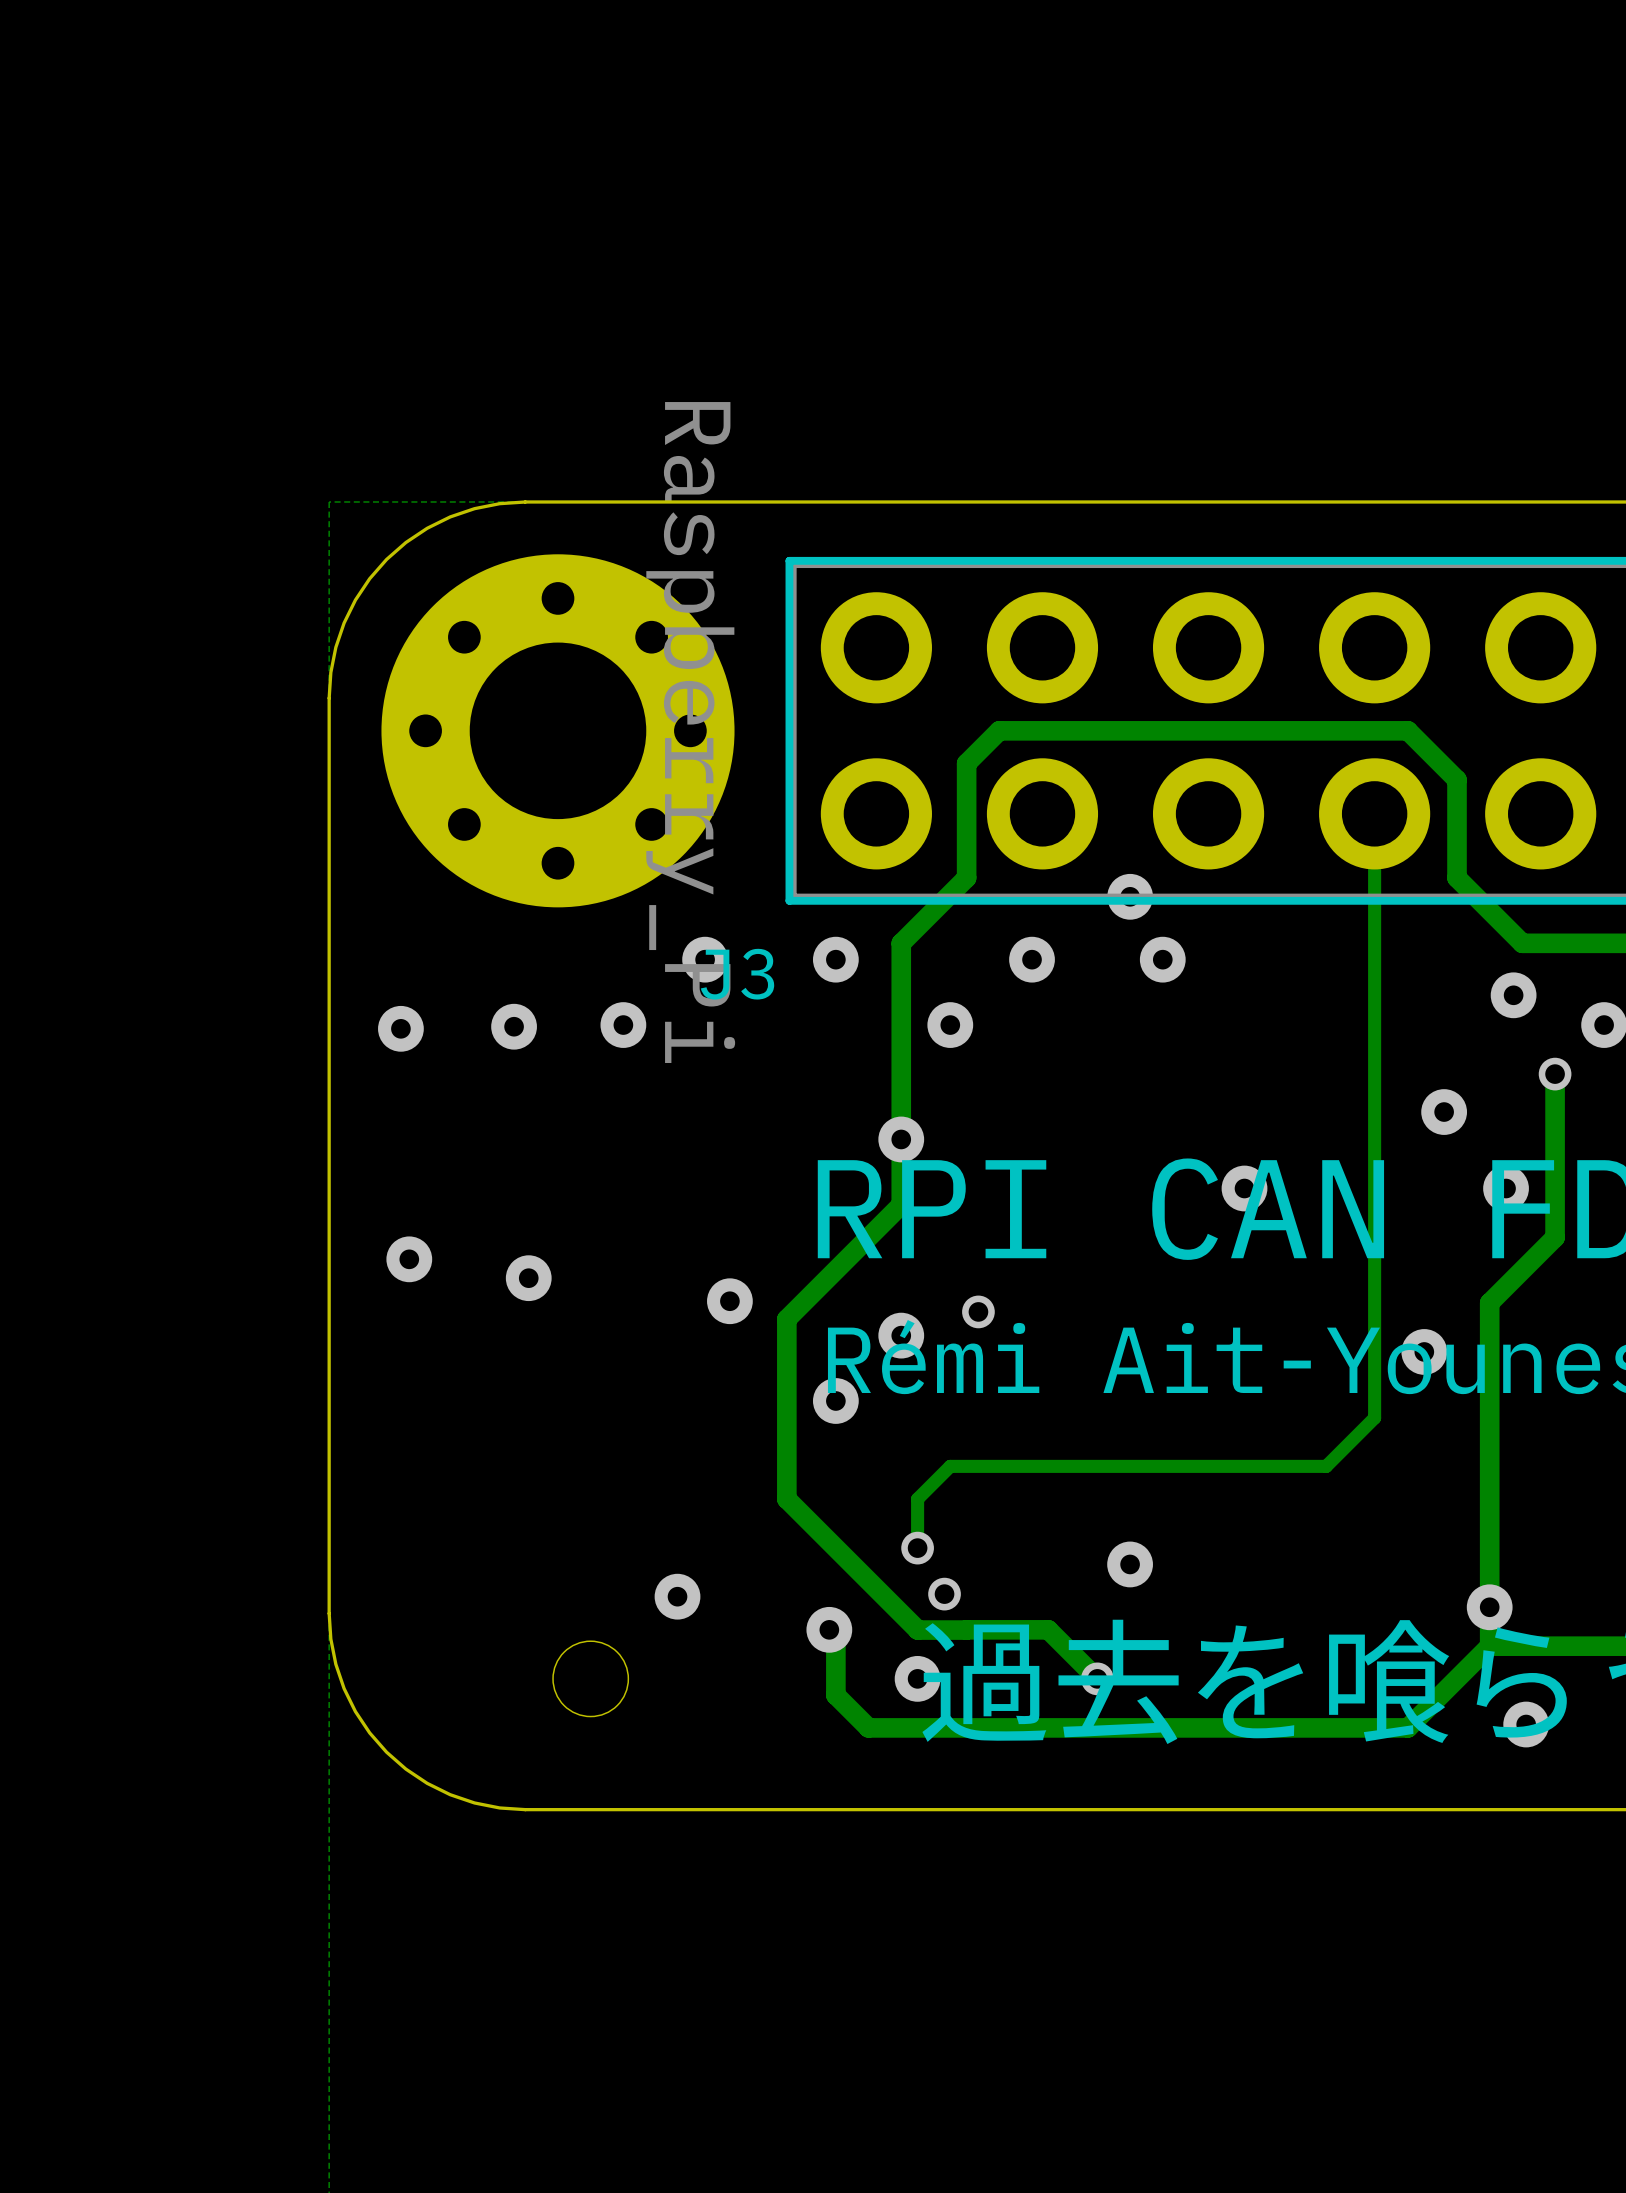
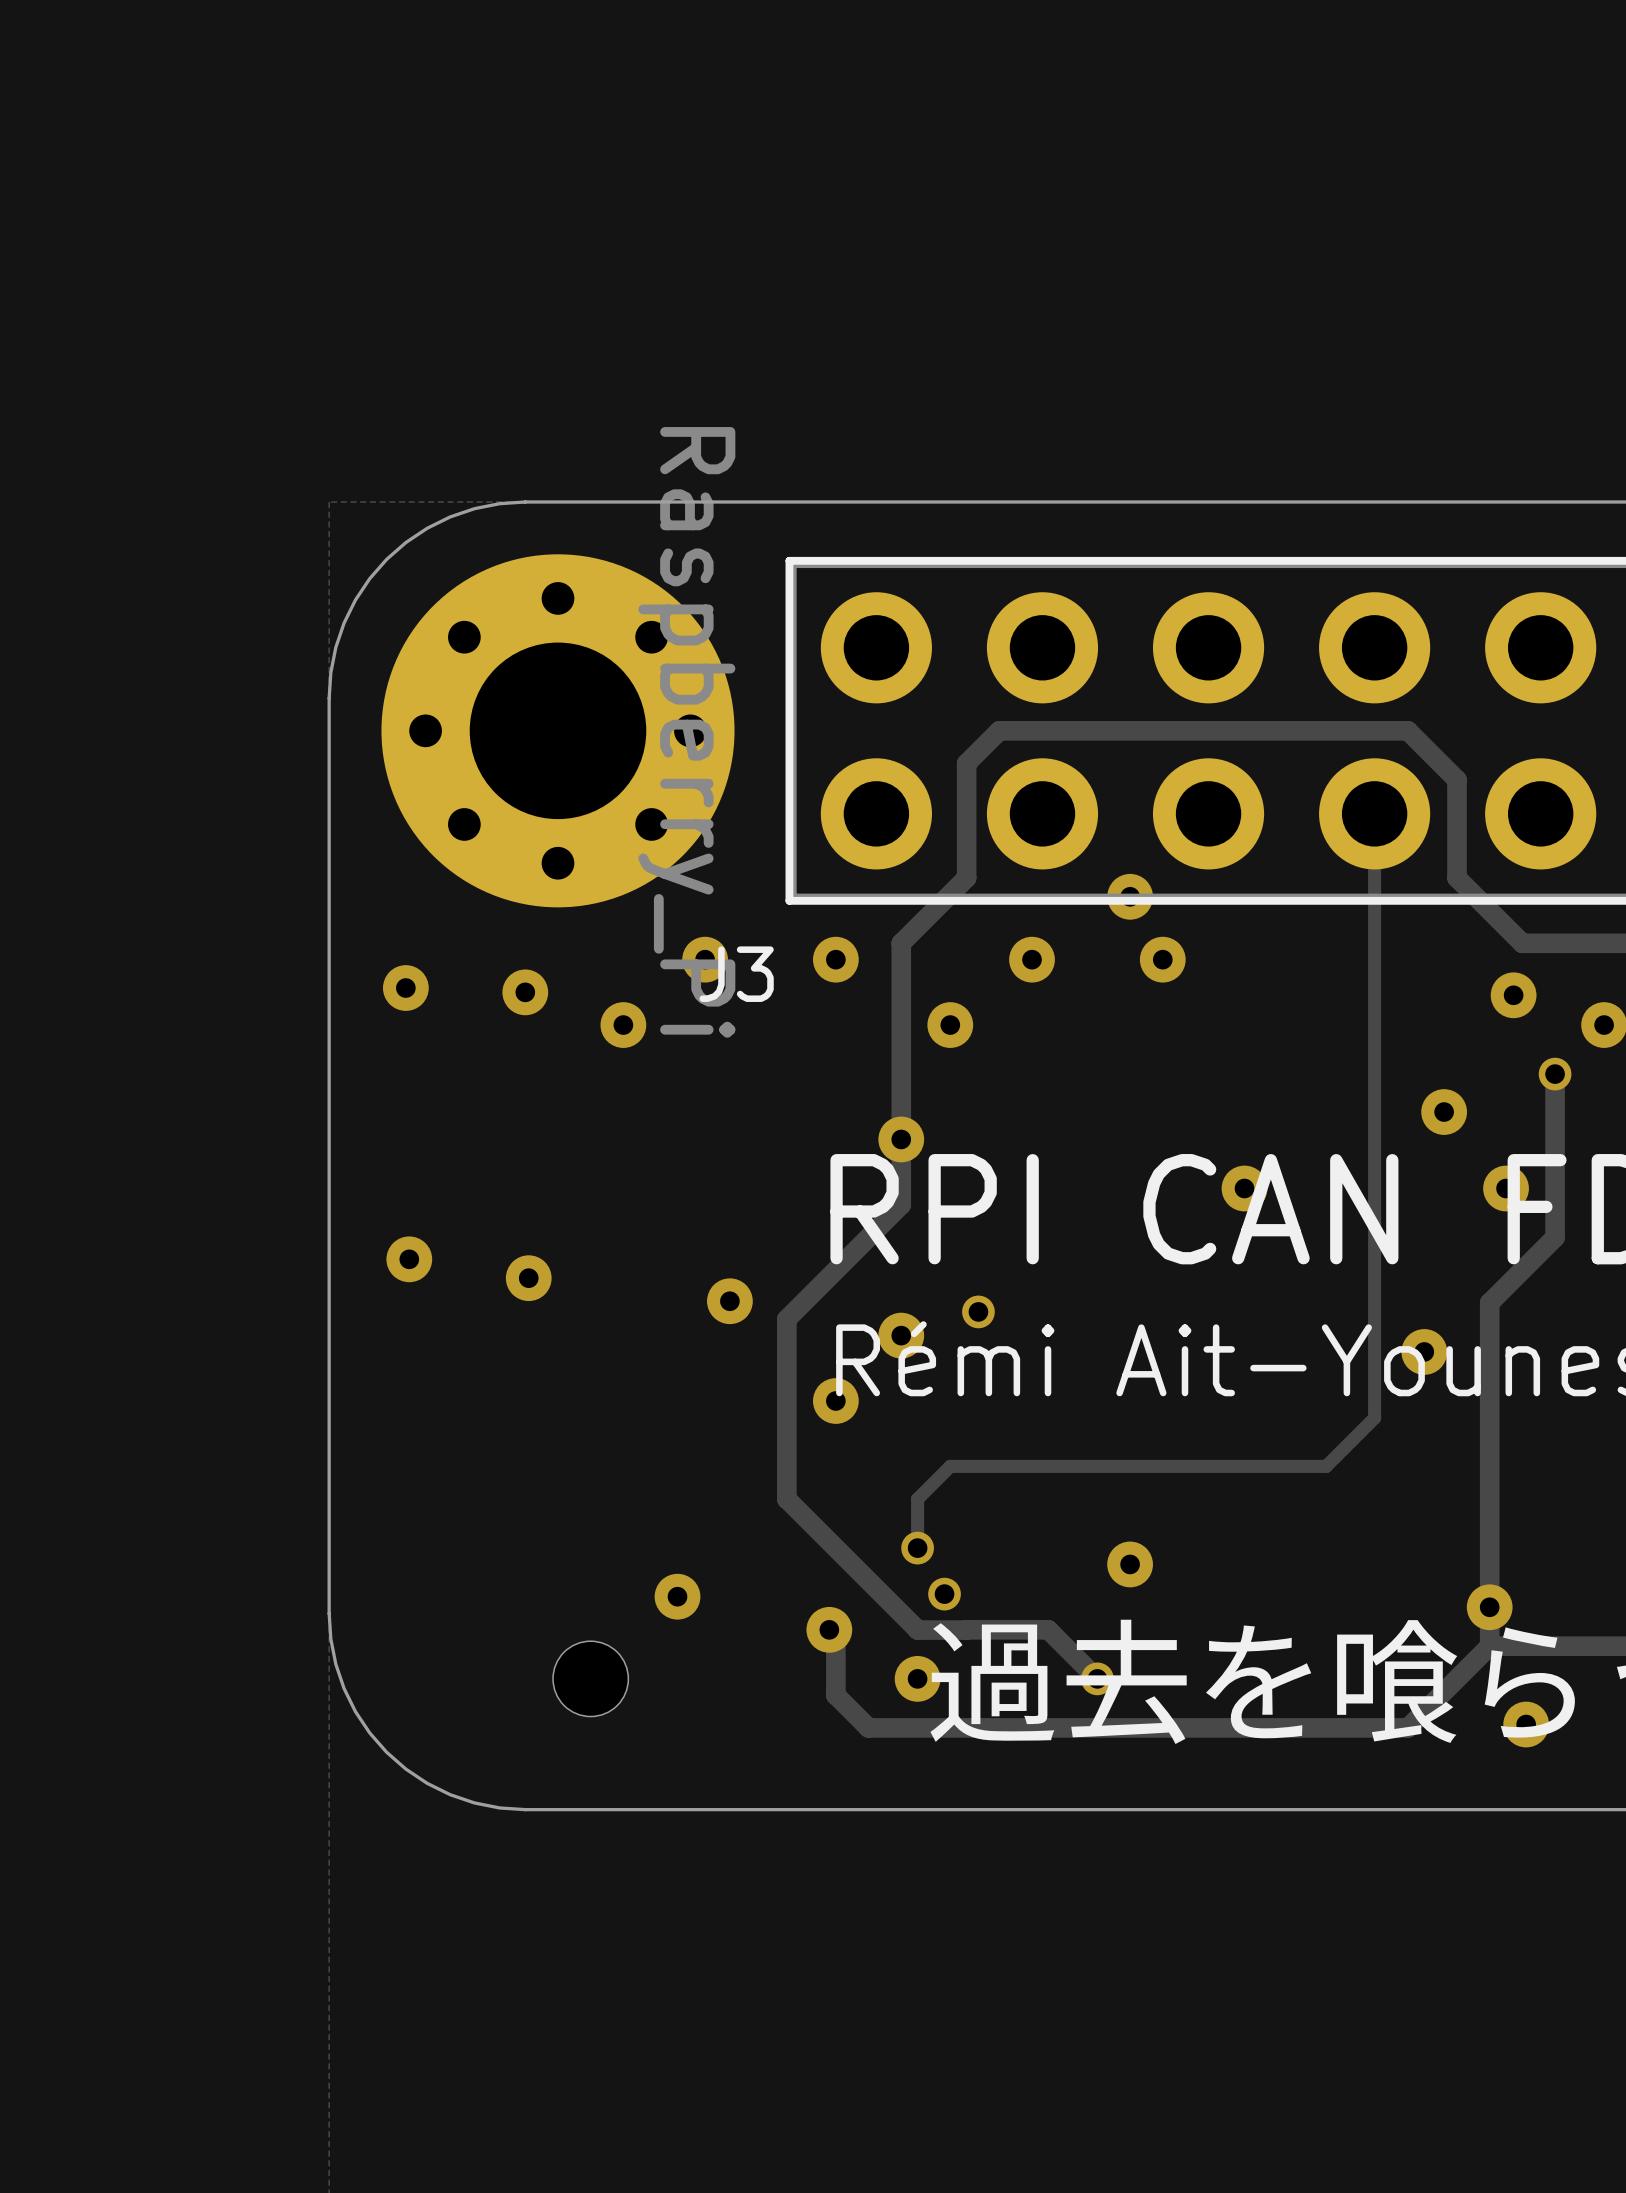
via position: (514, 1026) -> (525, 992)
via position: (400, 1028) -> (405, 988)

